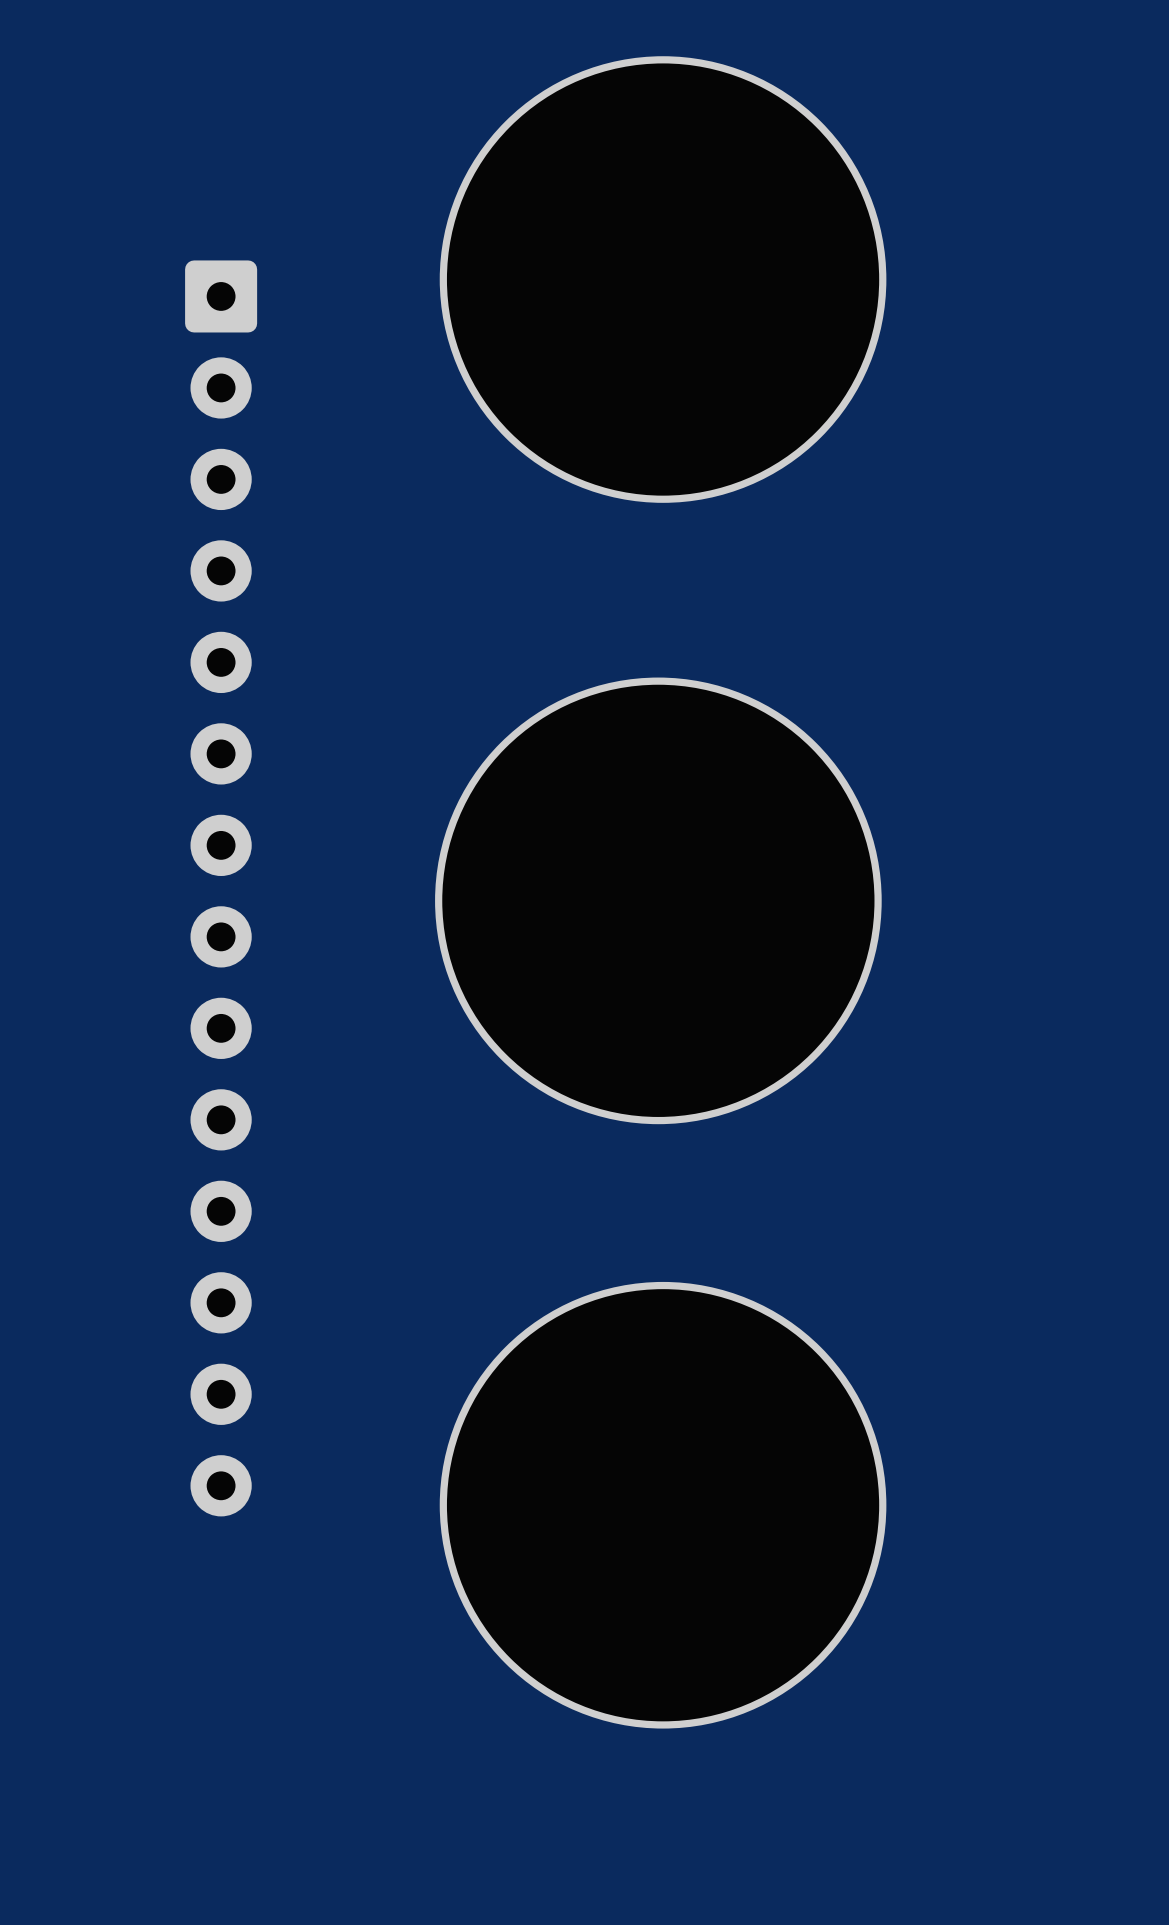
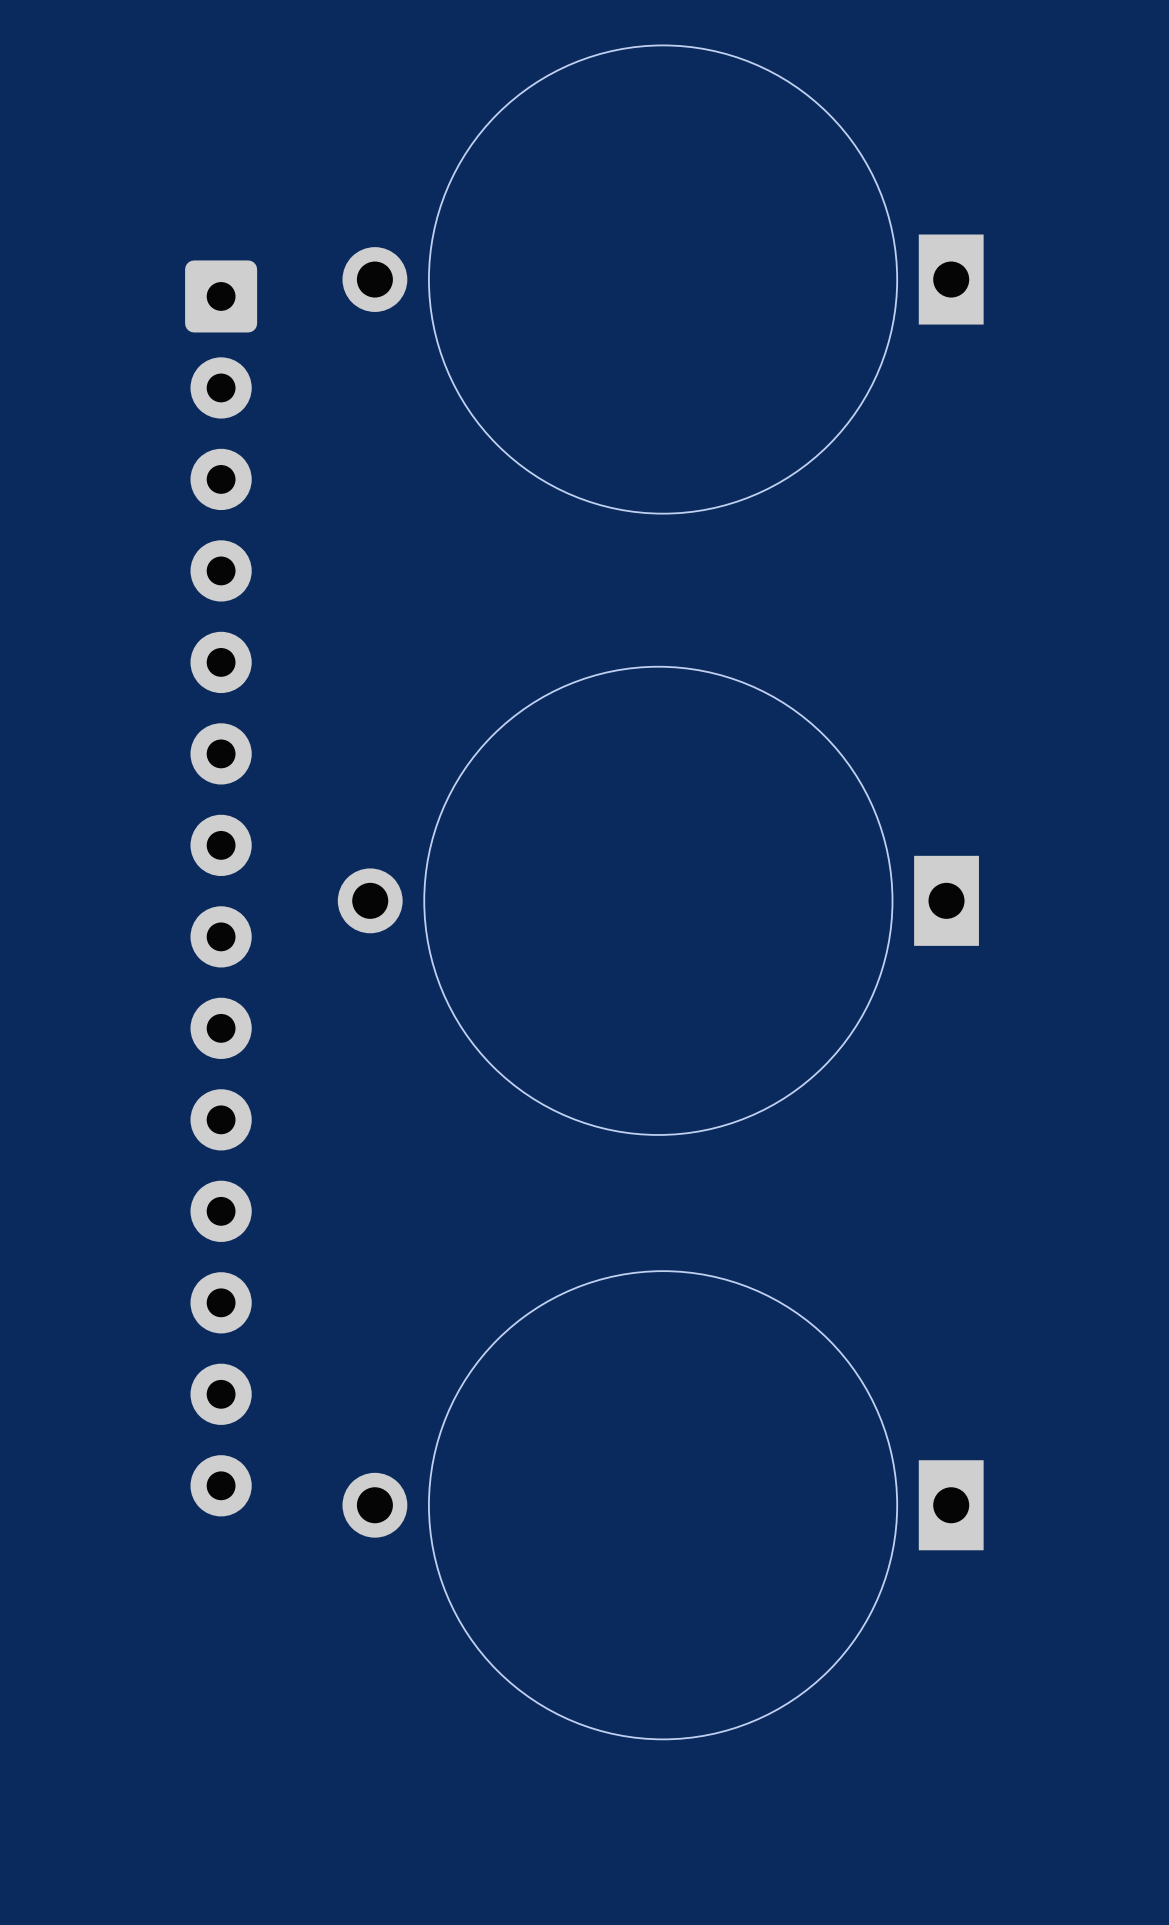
part footprint: [439, 56, 887, 503] -> [342, 44, 984, 515]
part footprint: [435, 677, 882, 1125] -> [337, 665, 979, 1136]
part footprint: [439, 1281, 887, 1729] -> [342, 1270, 984, 1741]

